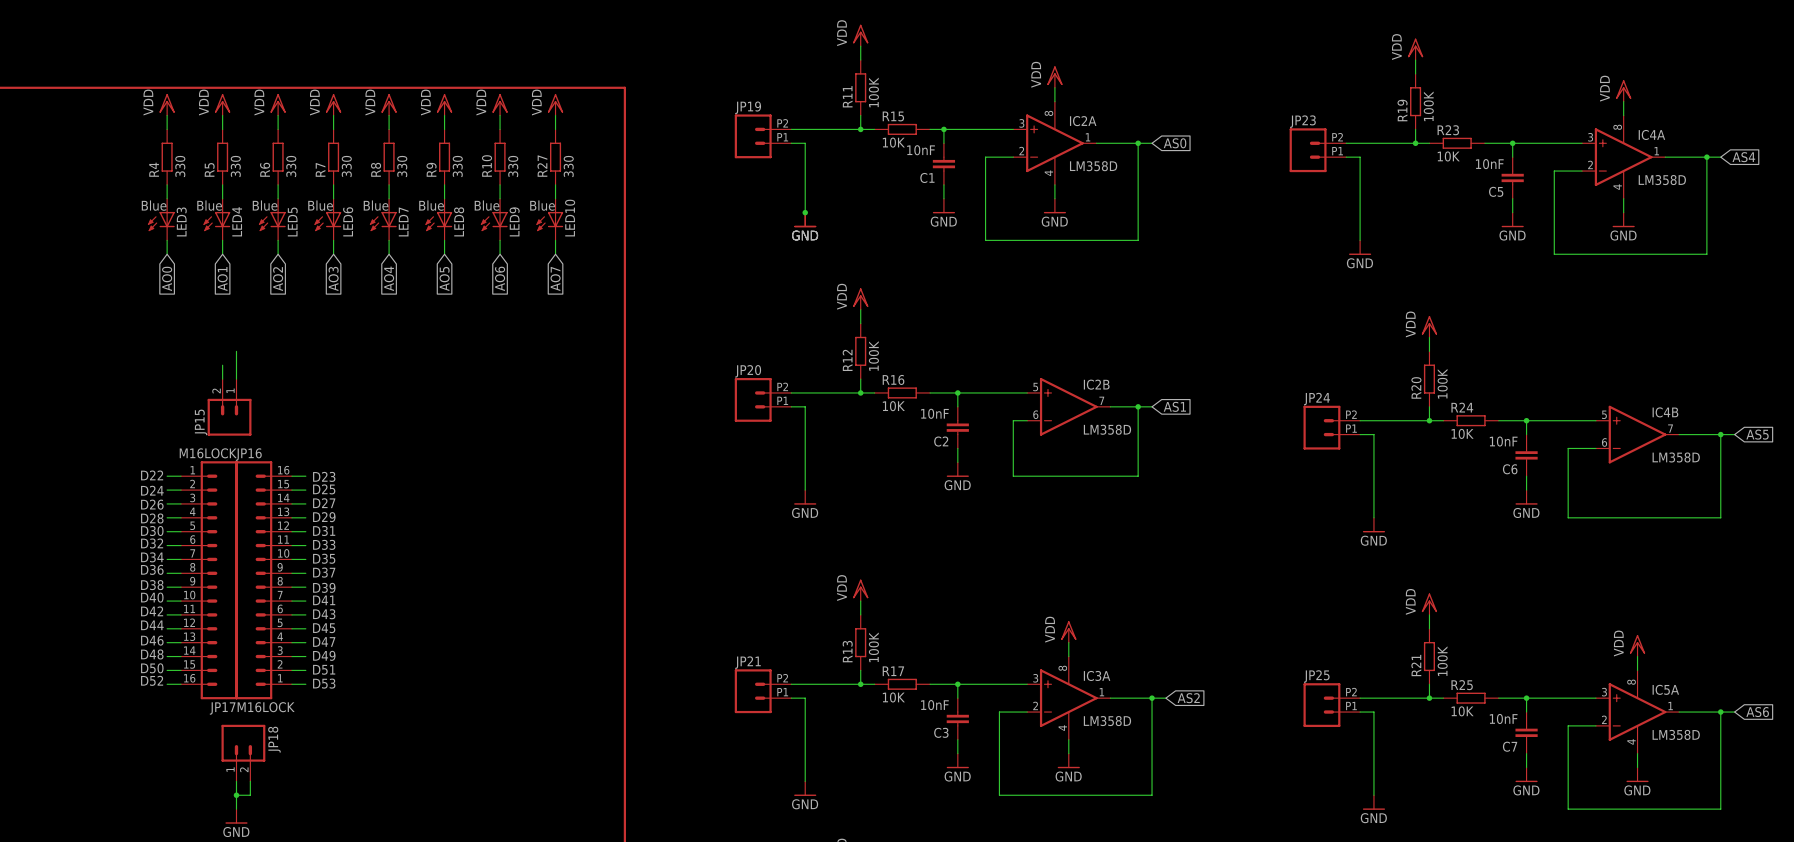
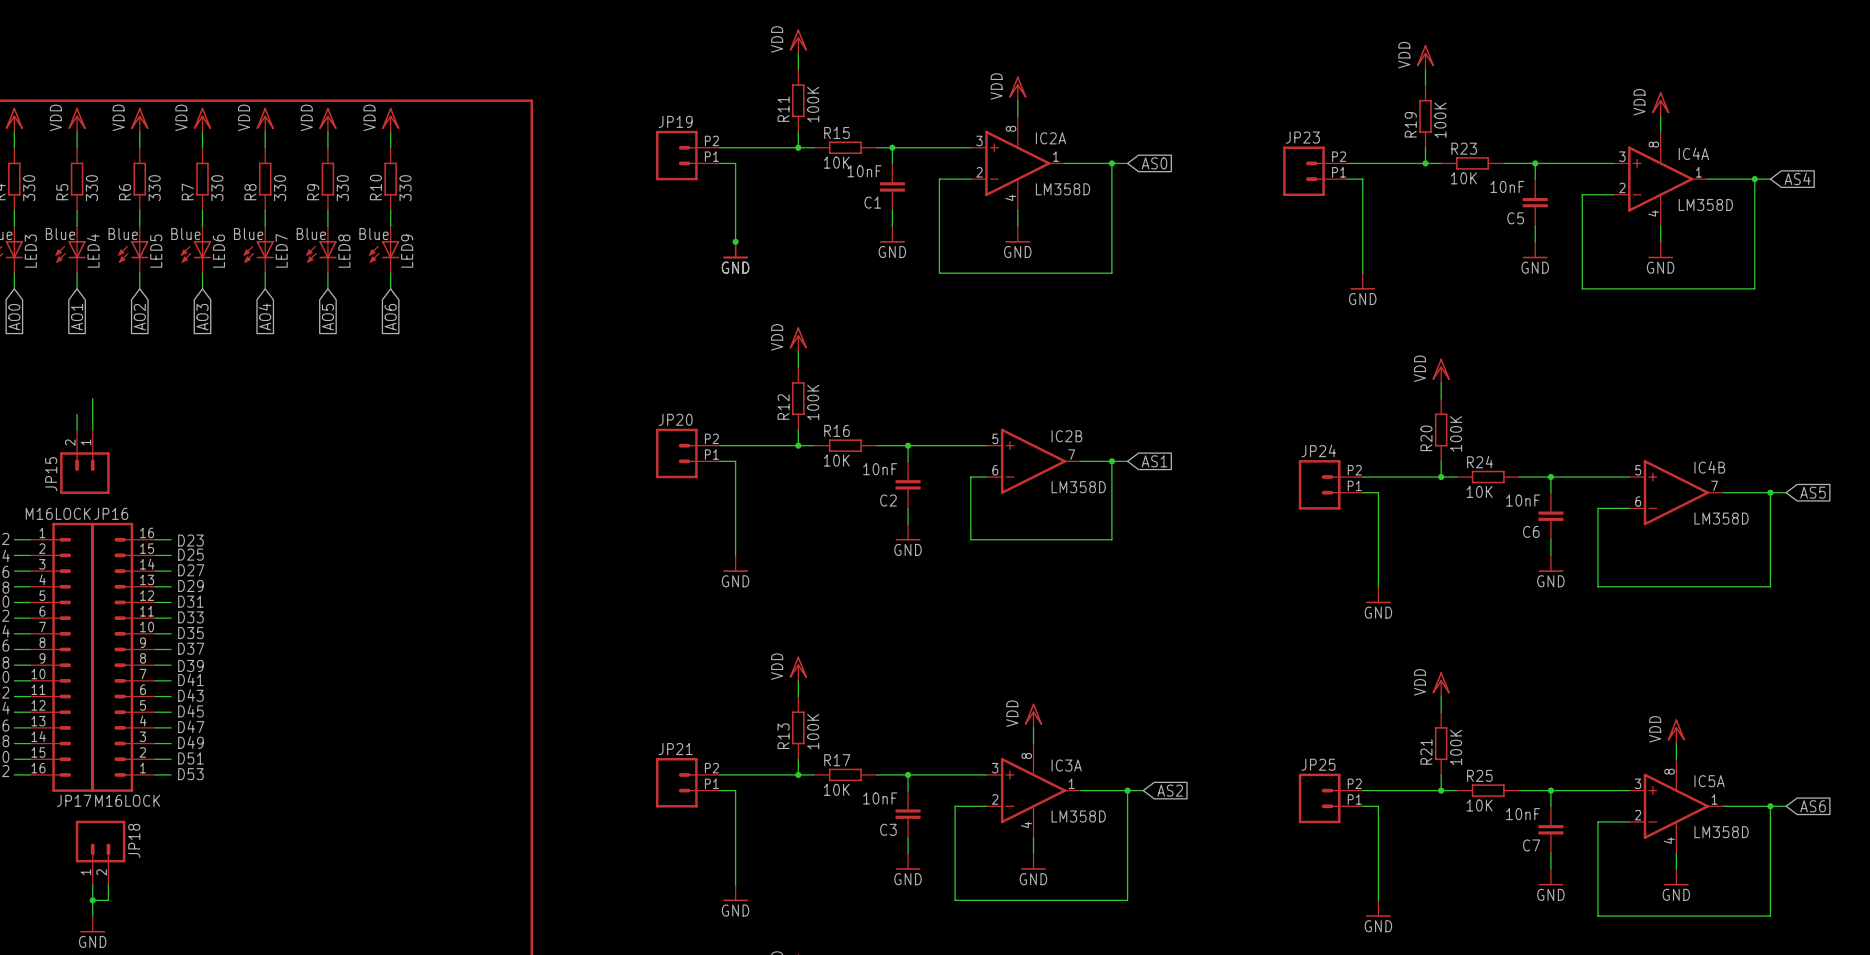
power symbol: VDD (555, 104) -> none
wire: (555, 115) (555, 129) -> none
R27: 330 (555, 157) -> none
wire: (555, 184) (555, 198) -> none
LED10: Blue (549, 219) -> none
wire: (555, 240) (555, 254) -> none
global label: AO7 (555, 279) -> none

